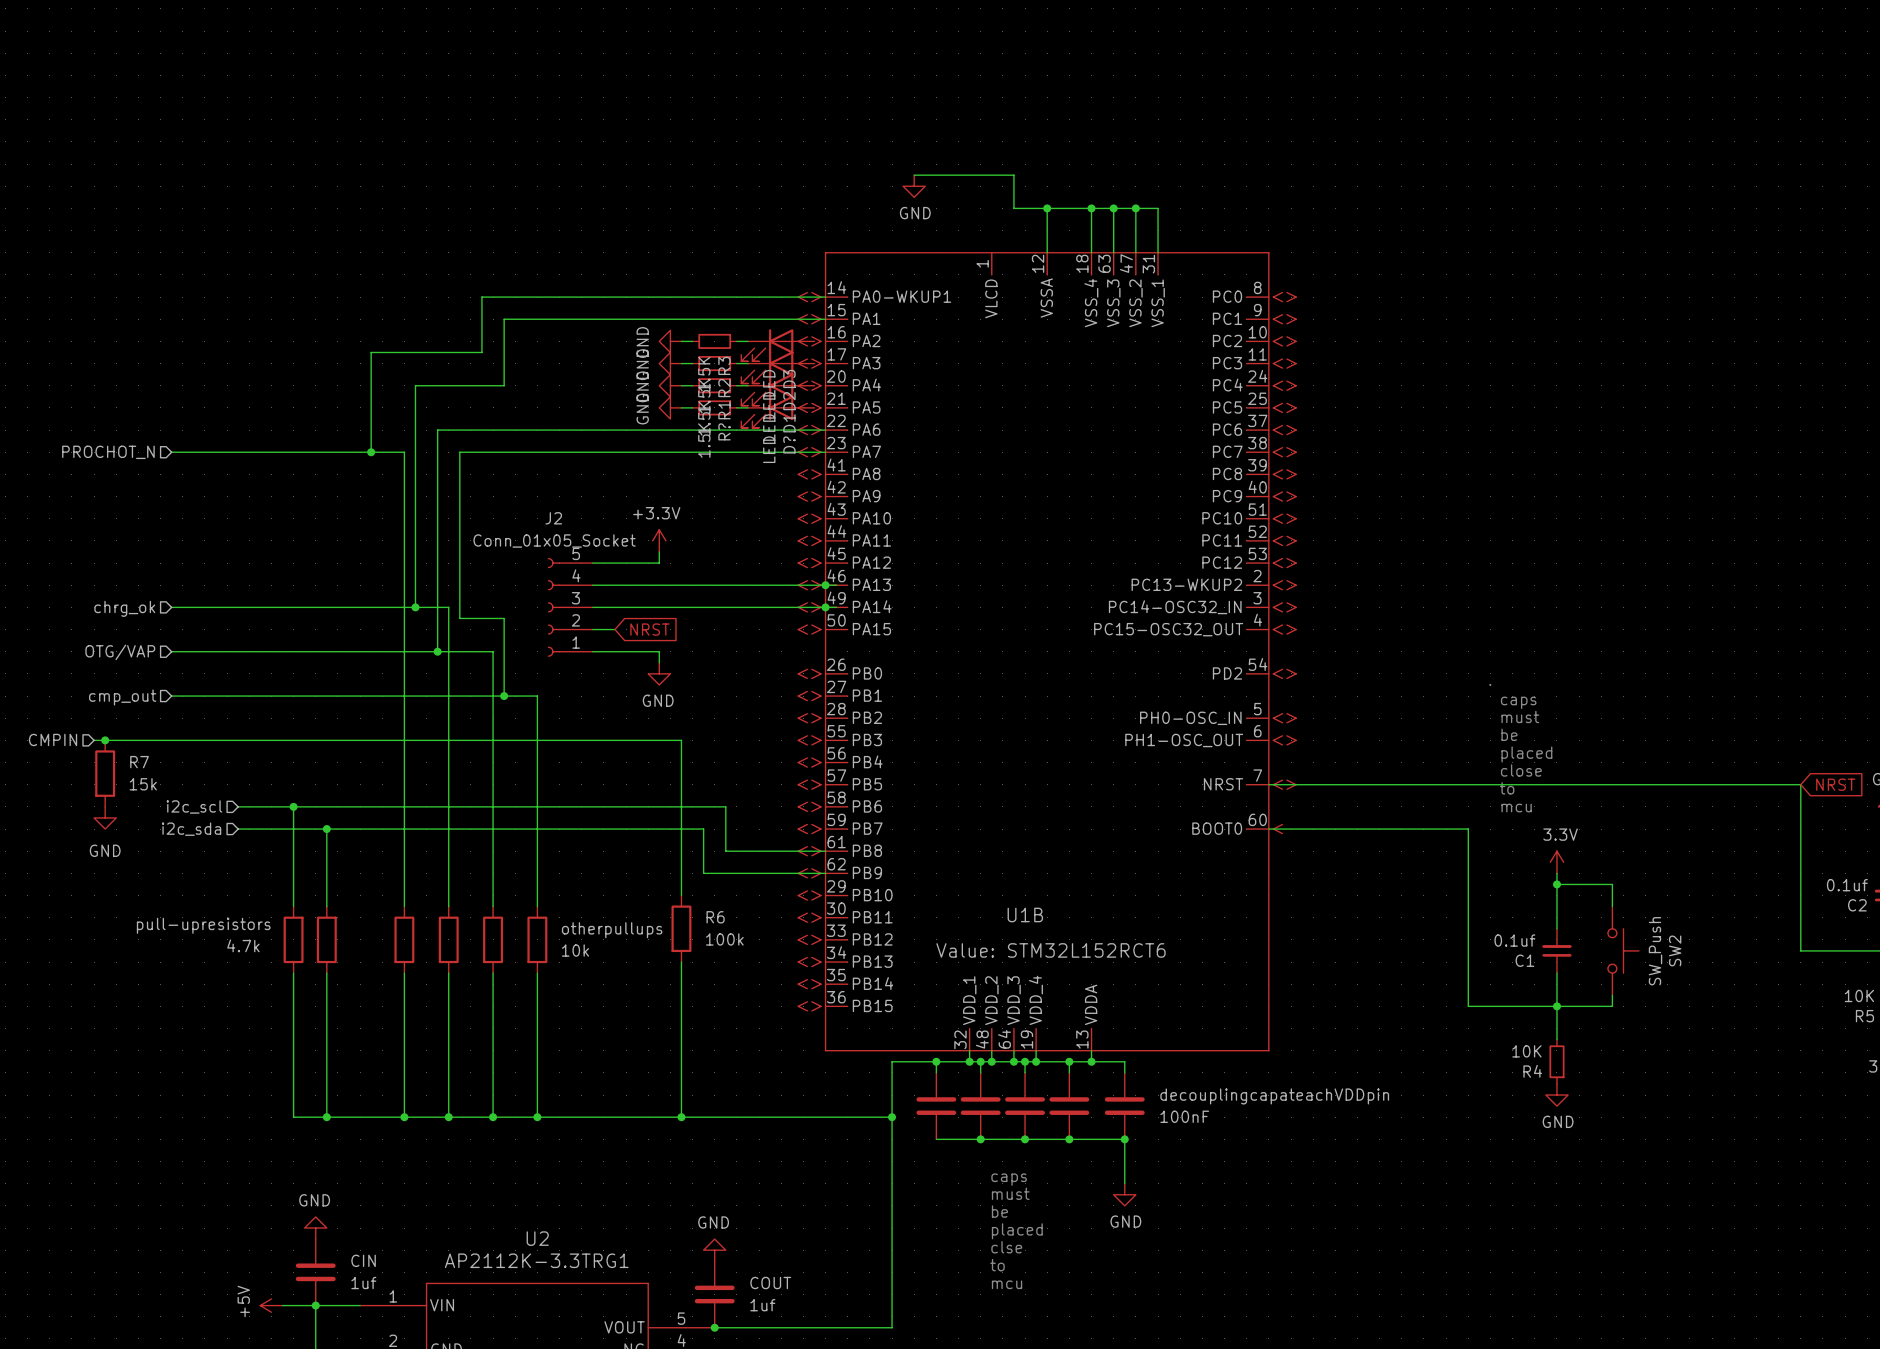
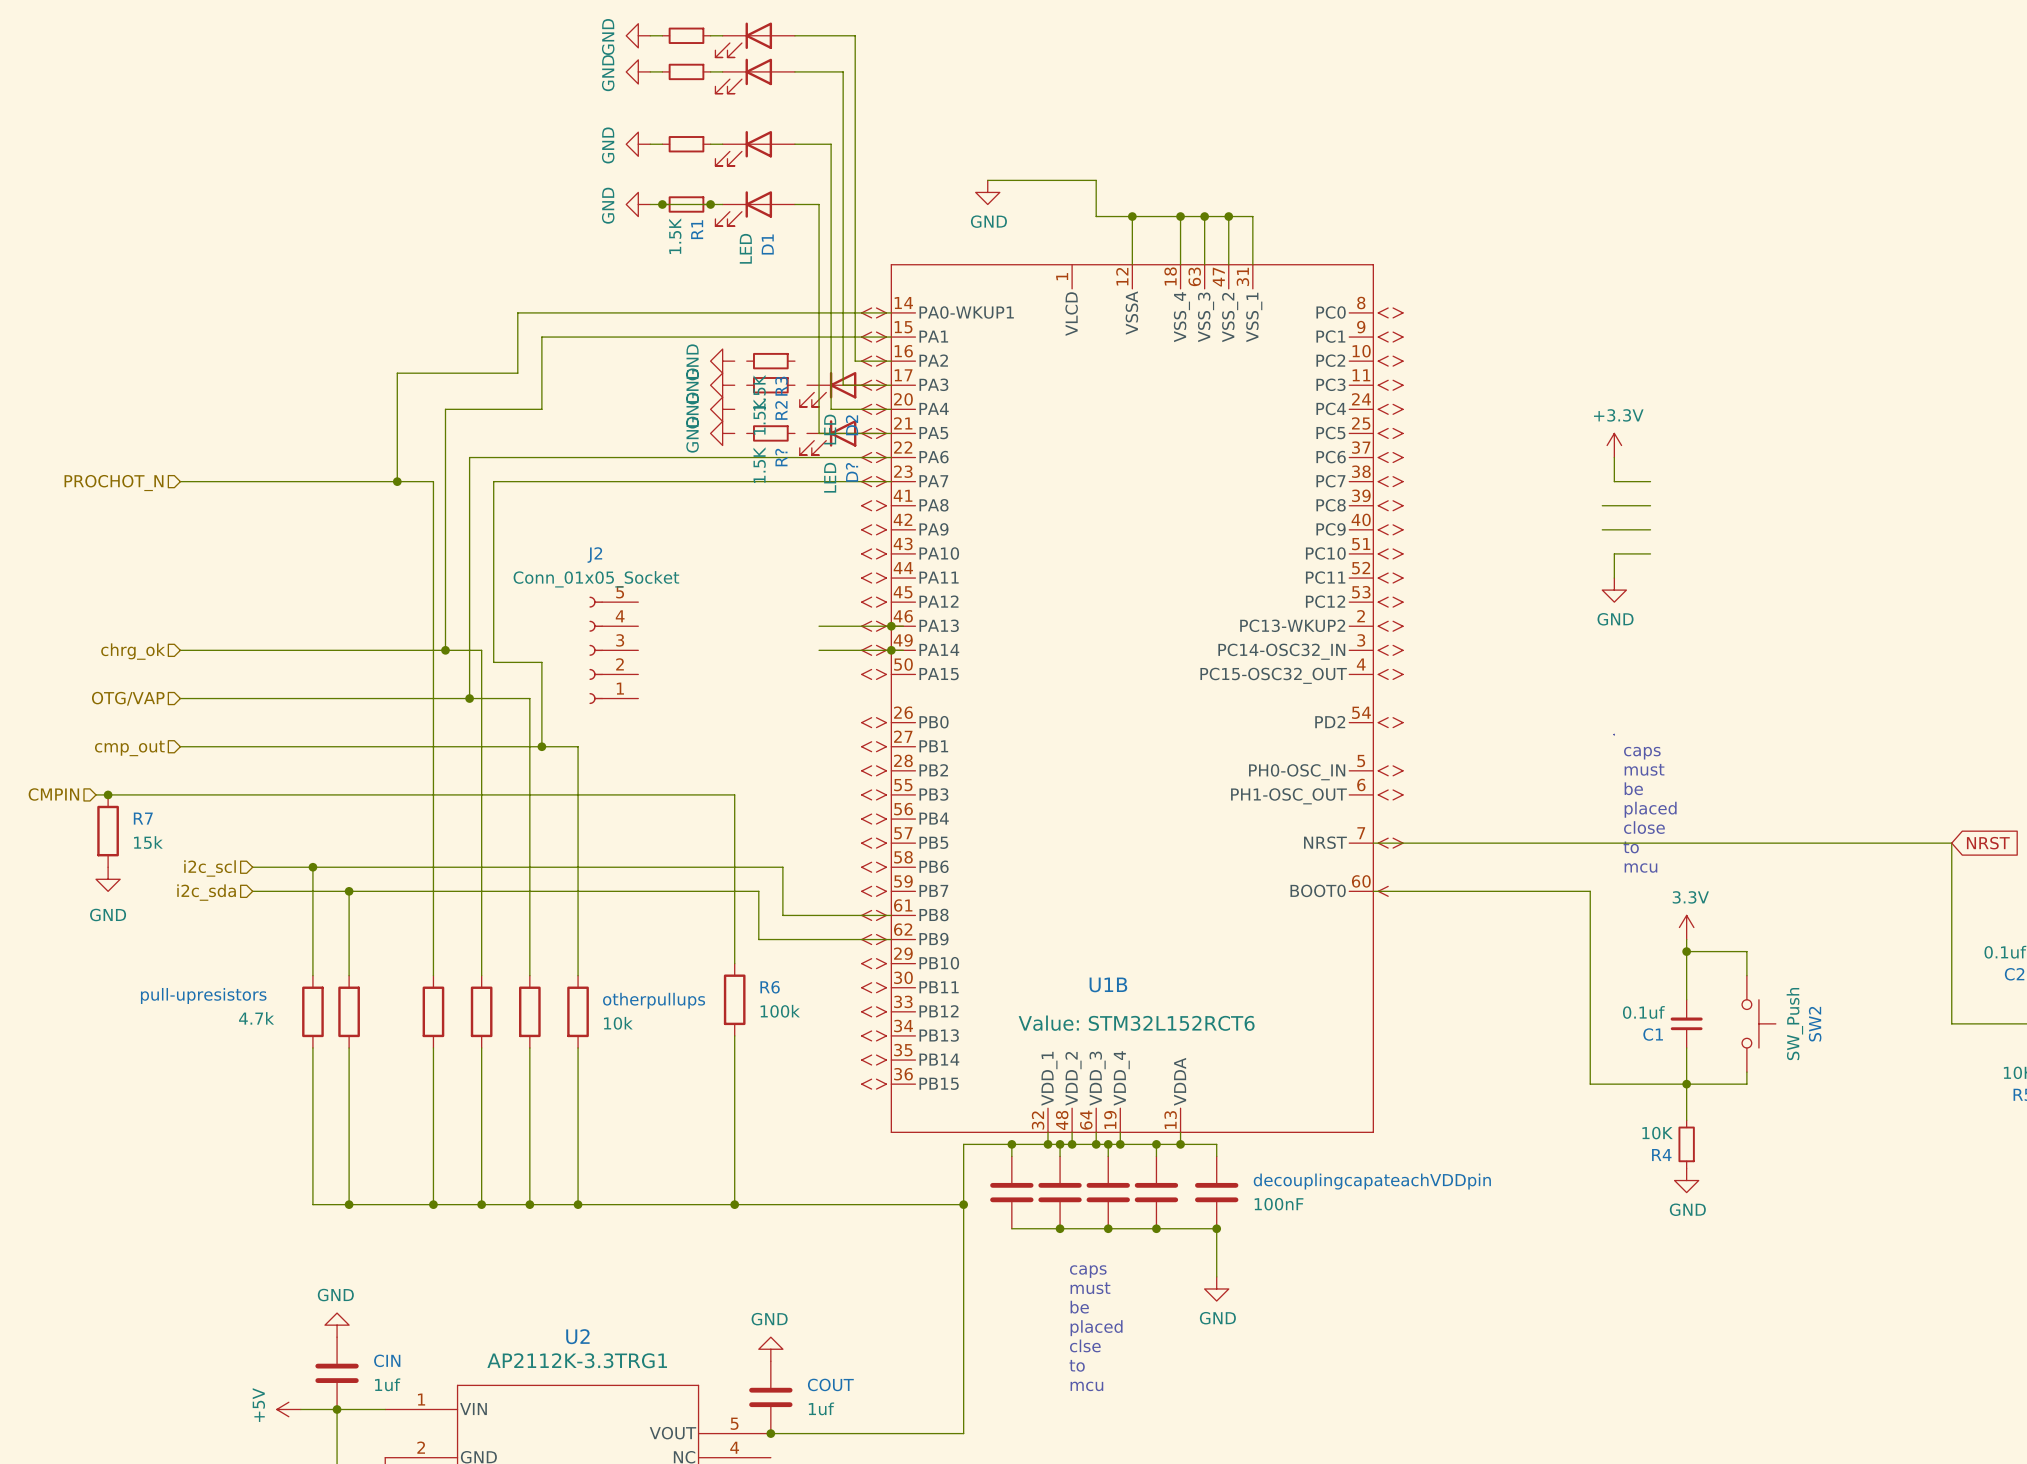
power symbol: none -> GND (638, 35)
wire: none -> (650, 35) (662, 35)
part: none -> (686, 35)
wire: none -> (710, 35) (722, 35)
wire: none -> (794, 35) (855, 35) (855, 361) (891, 361)
part: none -> (755, 40)
power symbol: none -> GND (638, 71)
wire: none -> (650, 71) (662, 71)
part: none -> (686, 71)
wire: none -> (710, 71) (722, 71)
wire: none -> (794, 71) (843, 71) (843, 385) (891, 385)
part: none -> (755, 76)
power symbol: none -> GND (638, 144)
part: none -> (686, 144)
wire: none -> (794, 144) (831, 144) (831, 409) (891, 409)
part: none -> (755, 148)
power symbol: none -> GND (638, 204)
wire: none -> (650, 204) (722, 204)
junction: none -> (662, 204)
junction: none -> (710, 204)
wire: none -> (794, 204) (819, 204) (819, 433) (891, 433)
wire: (681, 341) (692, 341) -> (650, 144) (662, 144)
wire: (736, 341) (747, 341) -> (710, 144) (722, 144)
D3: LED (777, 345) -> none
wire: (681, 363) (692, 363) -> none
wire: (736, 363) (747, 363) -> none
wire: (681, 385) (692, 385) -> none
R1 position: (714, 385) -> (686, 204)
wire: (736, 385) (747, 385) -> none
D1 position: (777, 389) -> (755, 208)
wire: (681, 407) (692, 407) -> none
wire: (736, 407) (747, 407) -> none
power symbol: none -> +3.3V (1614, 445)
wire: none -> (1614, 457) (1614, 481) (1650, 481)
wire: none -> (1602, 505) (1650, 505)
wire: none -> (1602, 529) (1650, 529)
wire: none -> (1650, 553) (1614, 553) (1614, 578)
power symbol: +3.3V (659, 540) -> none
wire: (659, 551) (659, 563) (592, 563) -> none
power symbol: none -> GND (1614, 590)
wire: (592, 585) (759, 585) -> none
wire: (592, 607) (759, 607) -> none
wire: (592, 629) (614, 629) -> none
global label: NRST (649, 629) -> none
wire: (592, 651) (659, 651) (659, 662) -> none
power symbol: GND (659, 673) -> none

